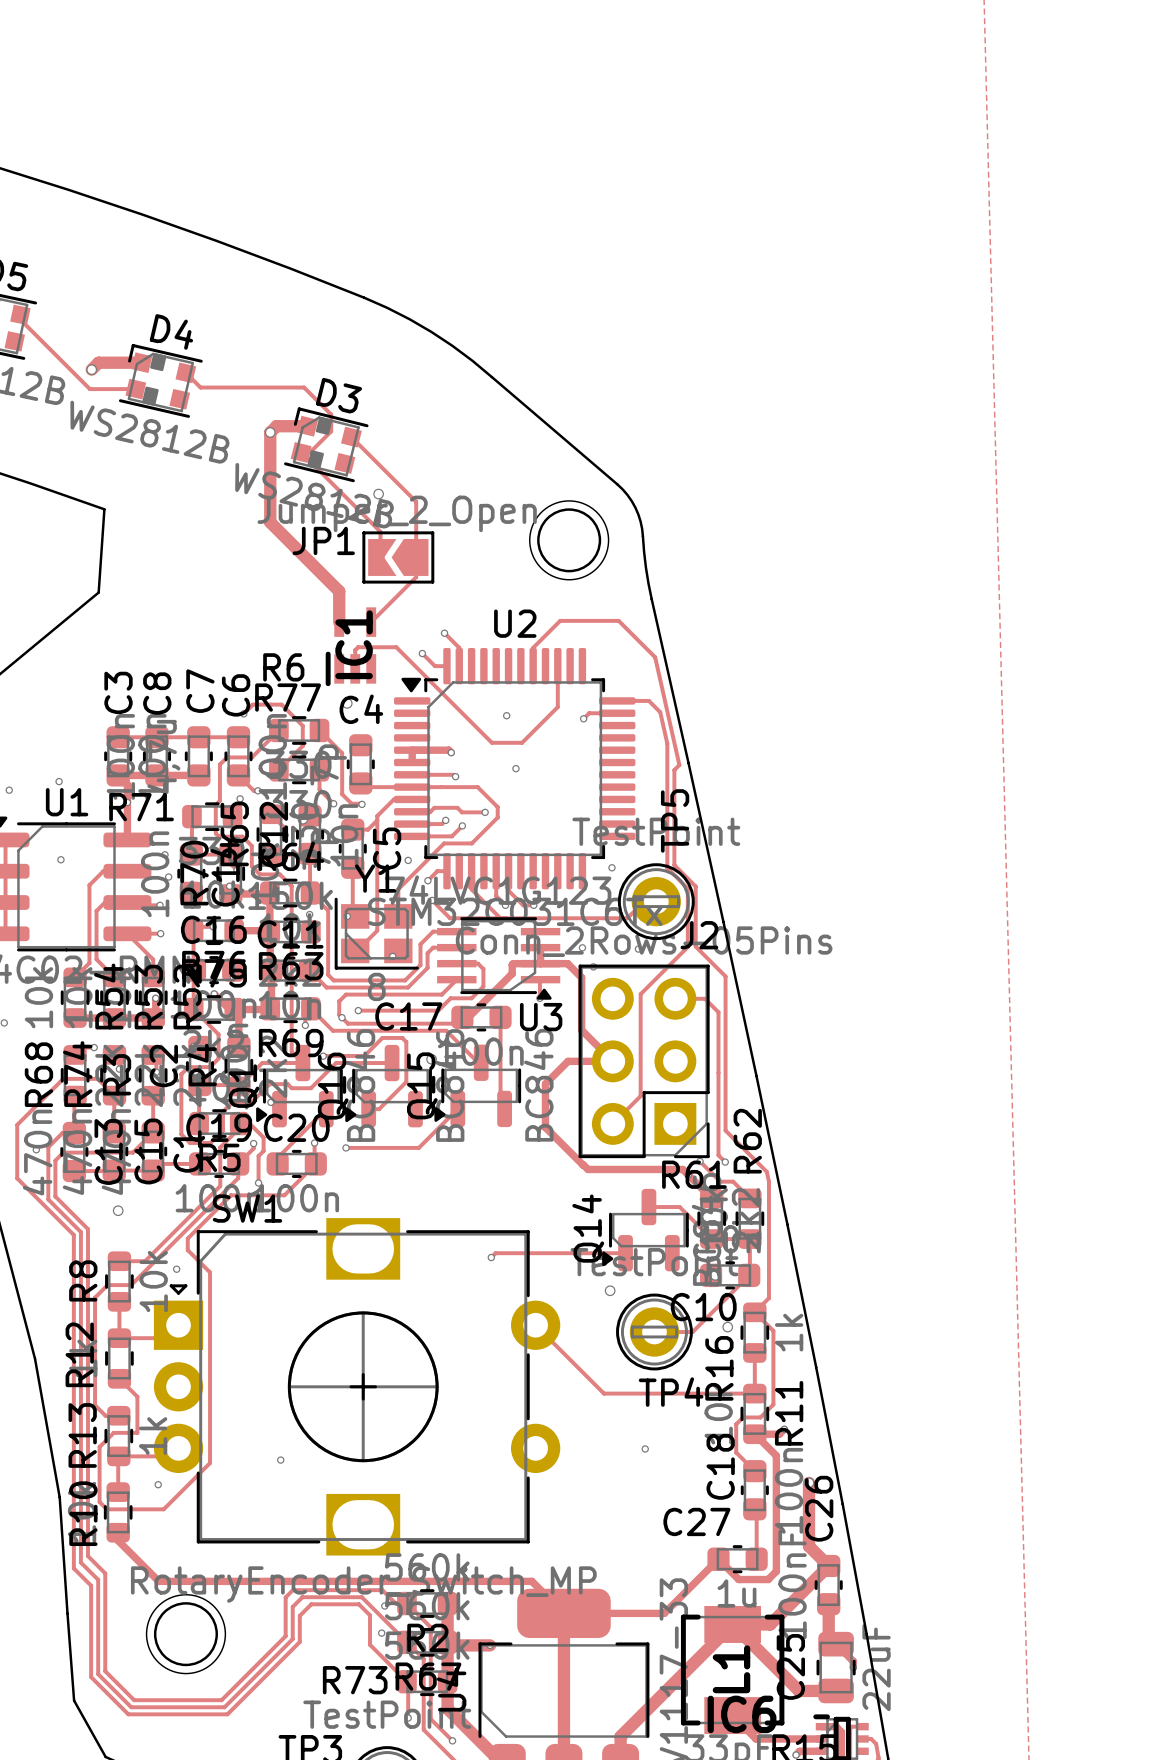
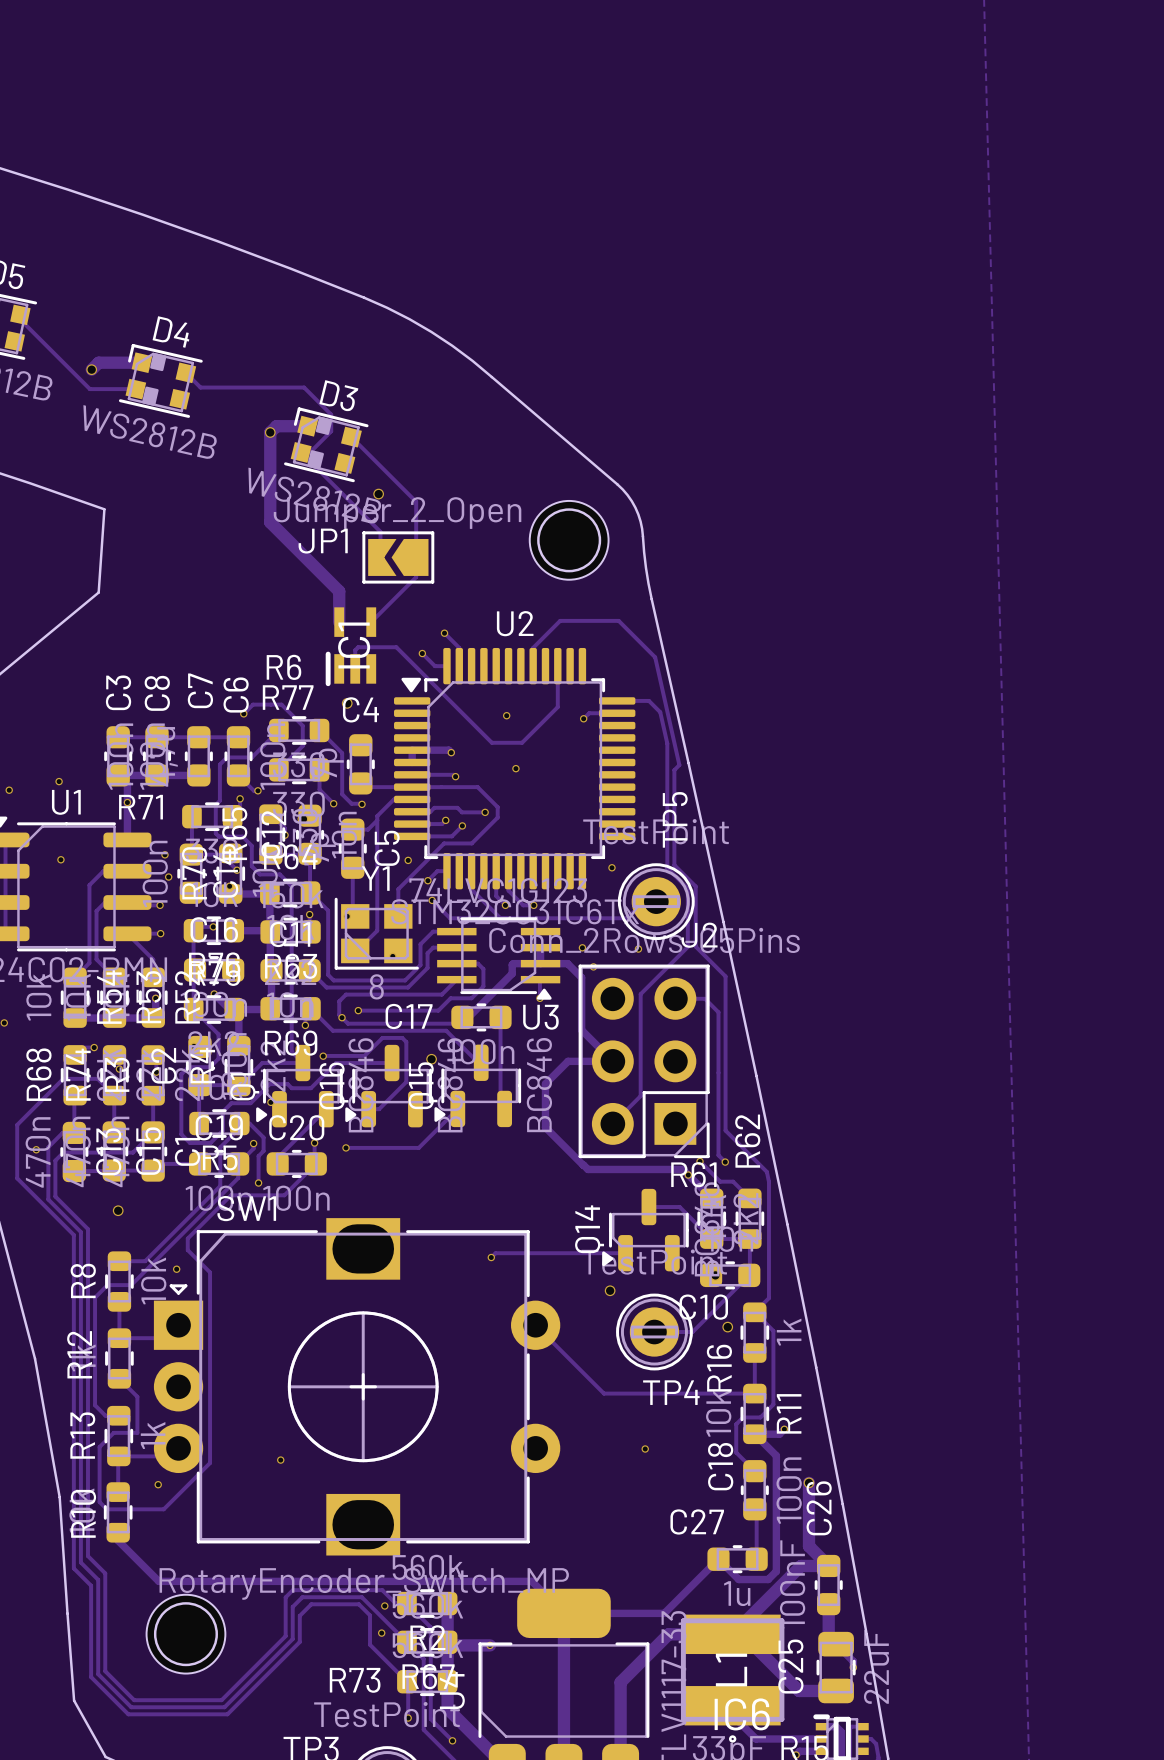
track: (828, 1565) (770, 1624) -> (828, 1565) (801, 1565) (732, 1634)
L1 footprint: [680, 1606, 785, 1735] -> [680, 1614, 785, 1743]
track: (742, 1634) (732, 1624) (620, 1736) -> (742, 1634) (668, 1634) (620, 1682) (620, 1736)

